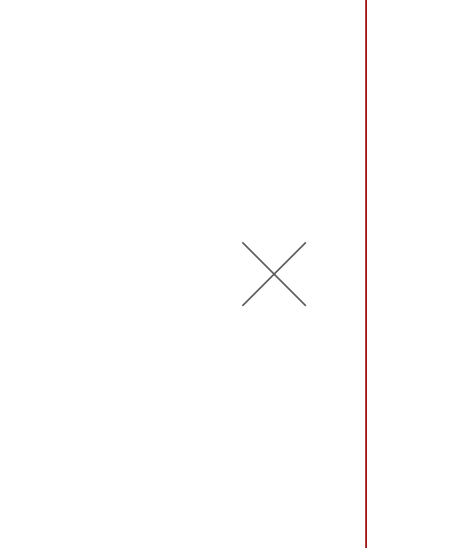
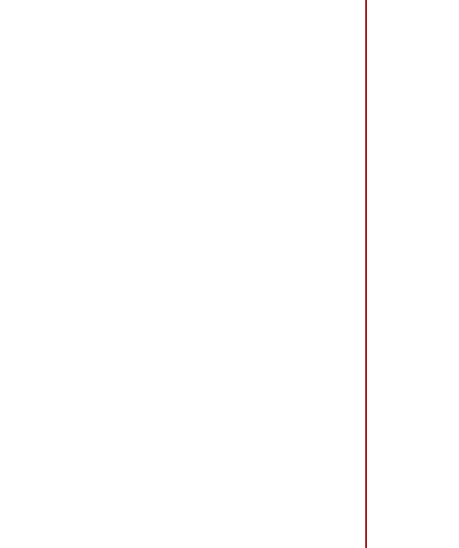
no-connect mark: (274, 274) -> none

